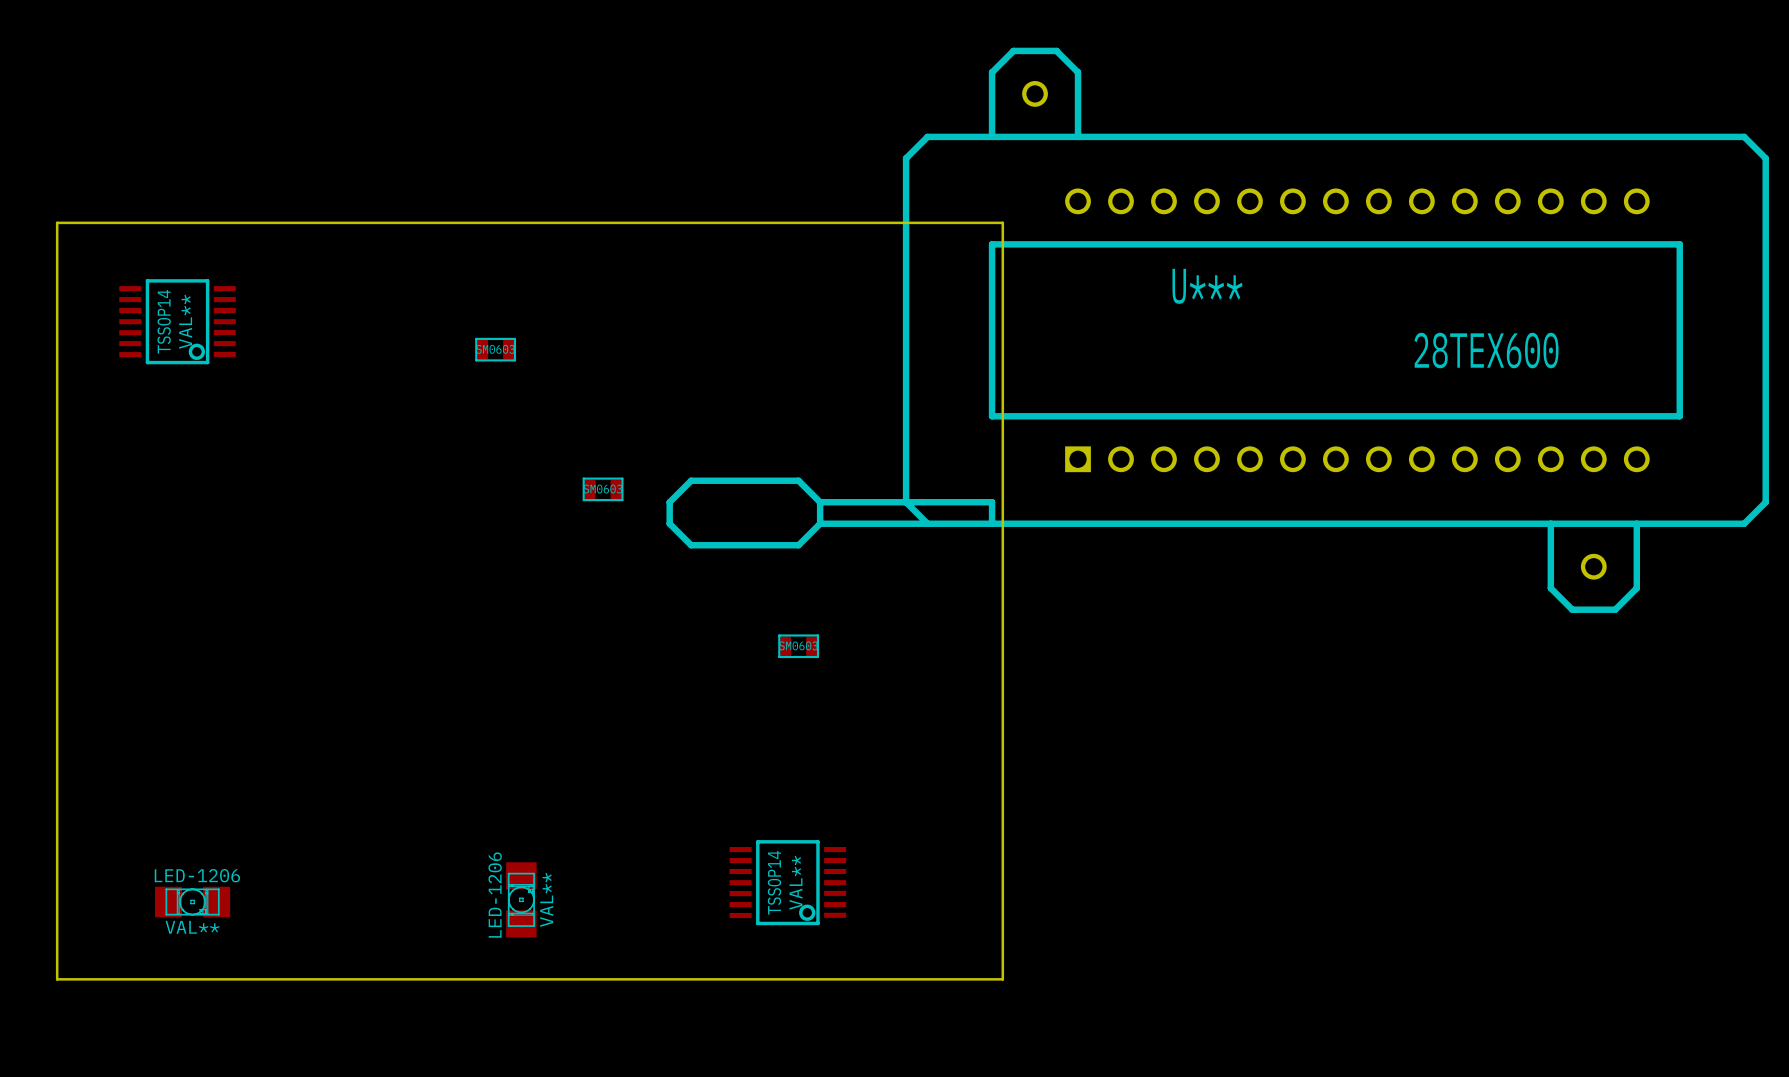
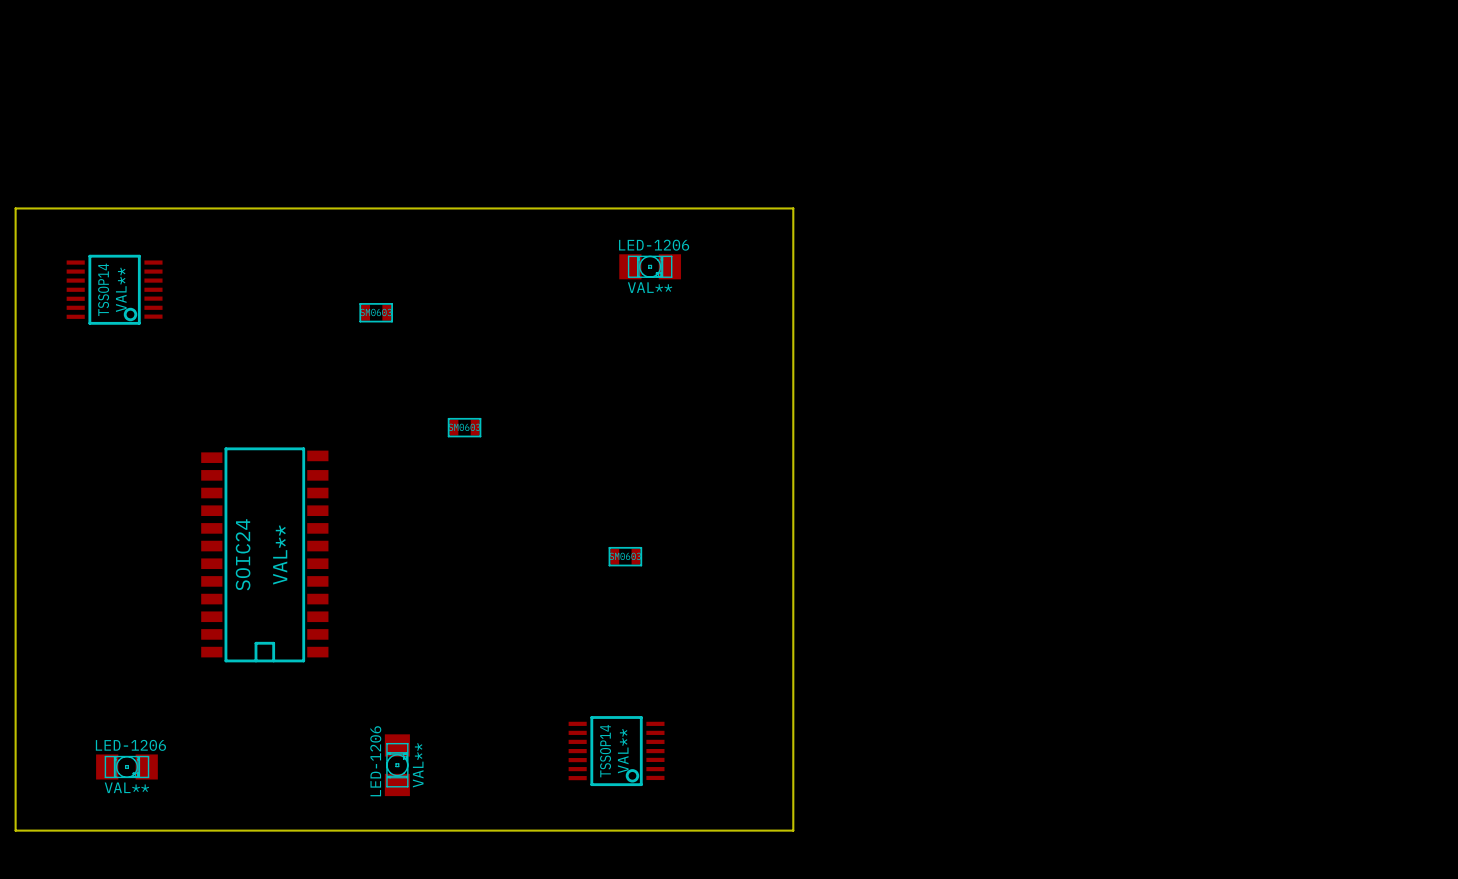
LED-1206: none -> VAL** (650, 266)
U***: 28TEX600 (1217, 330) -> none
SOIC24: none -> VAL** (264, 554)

